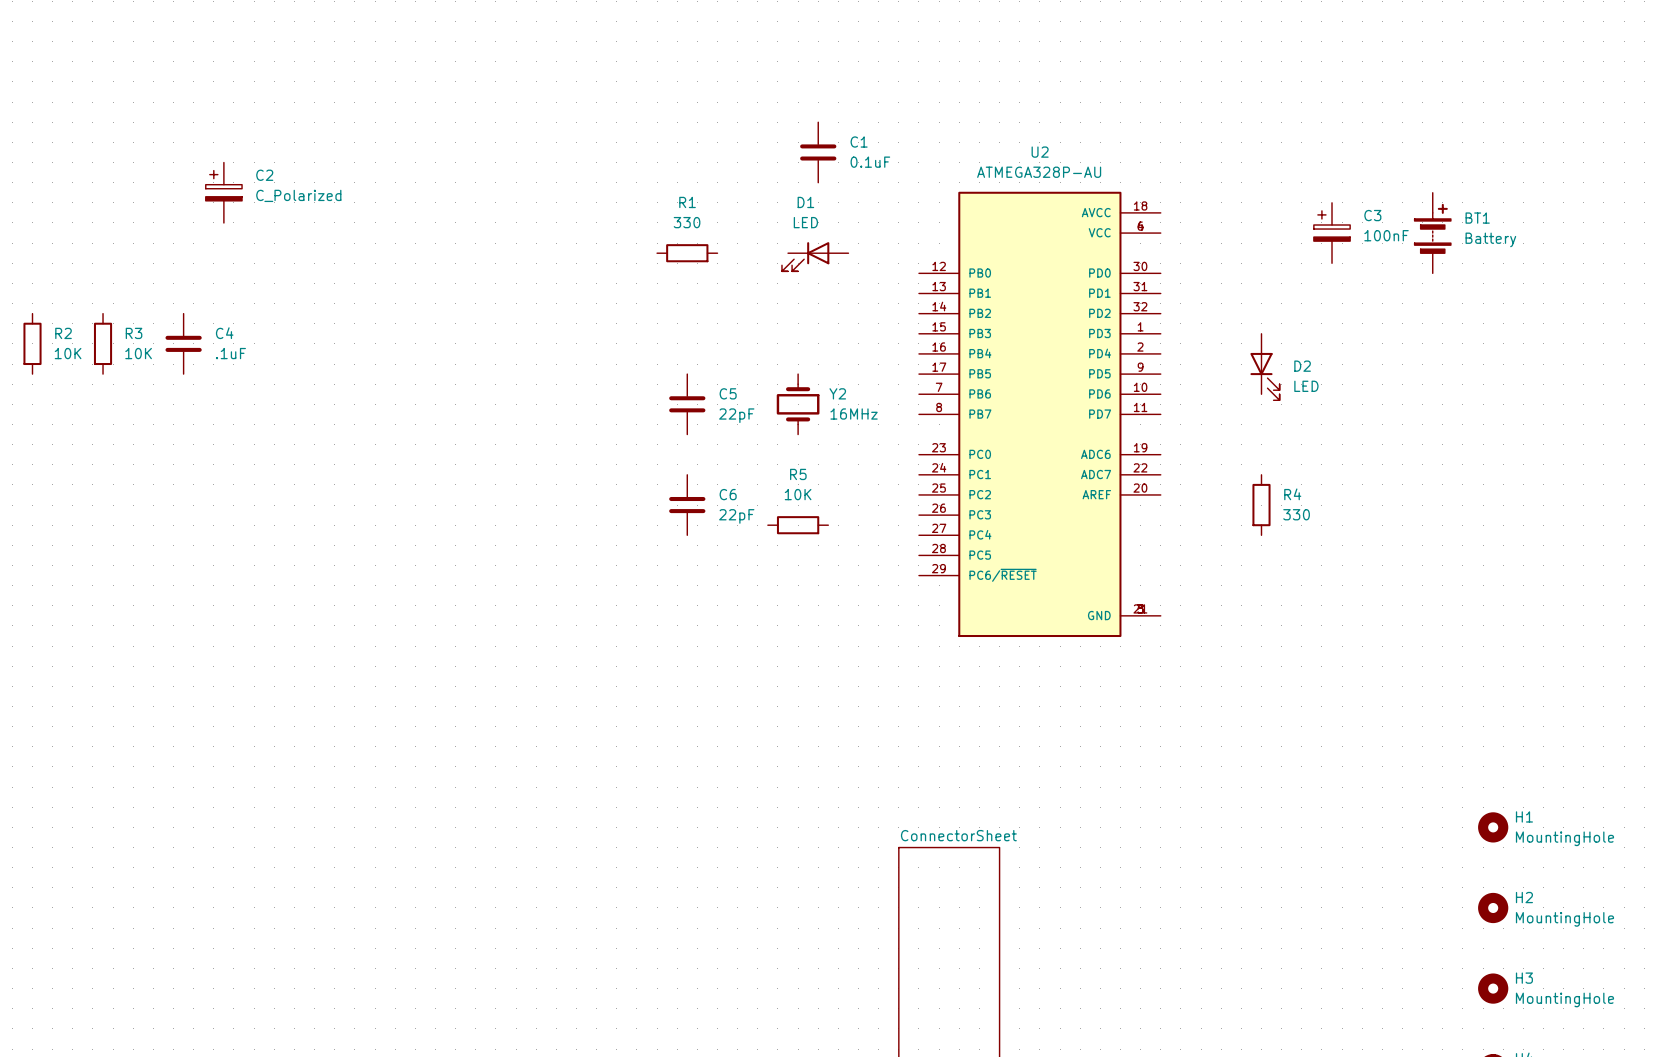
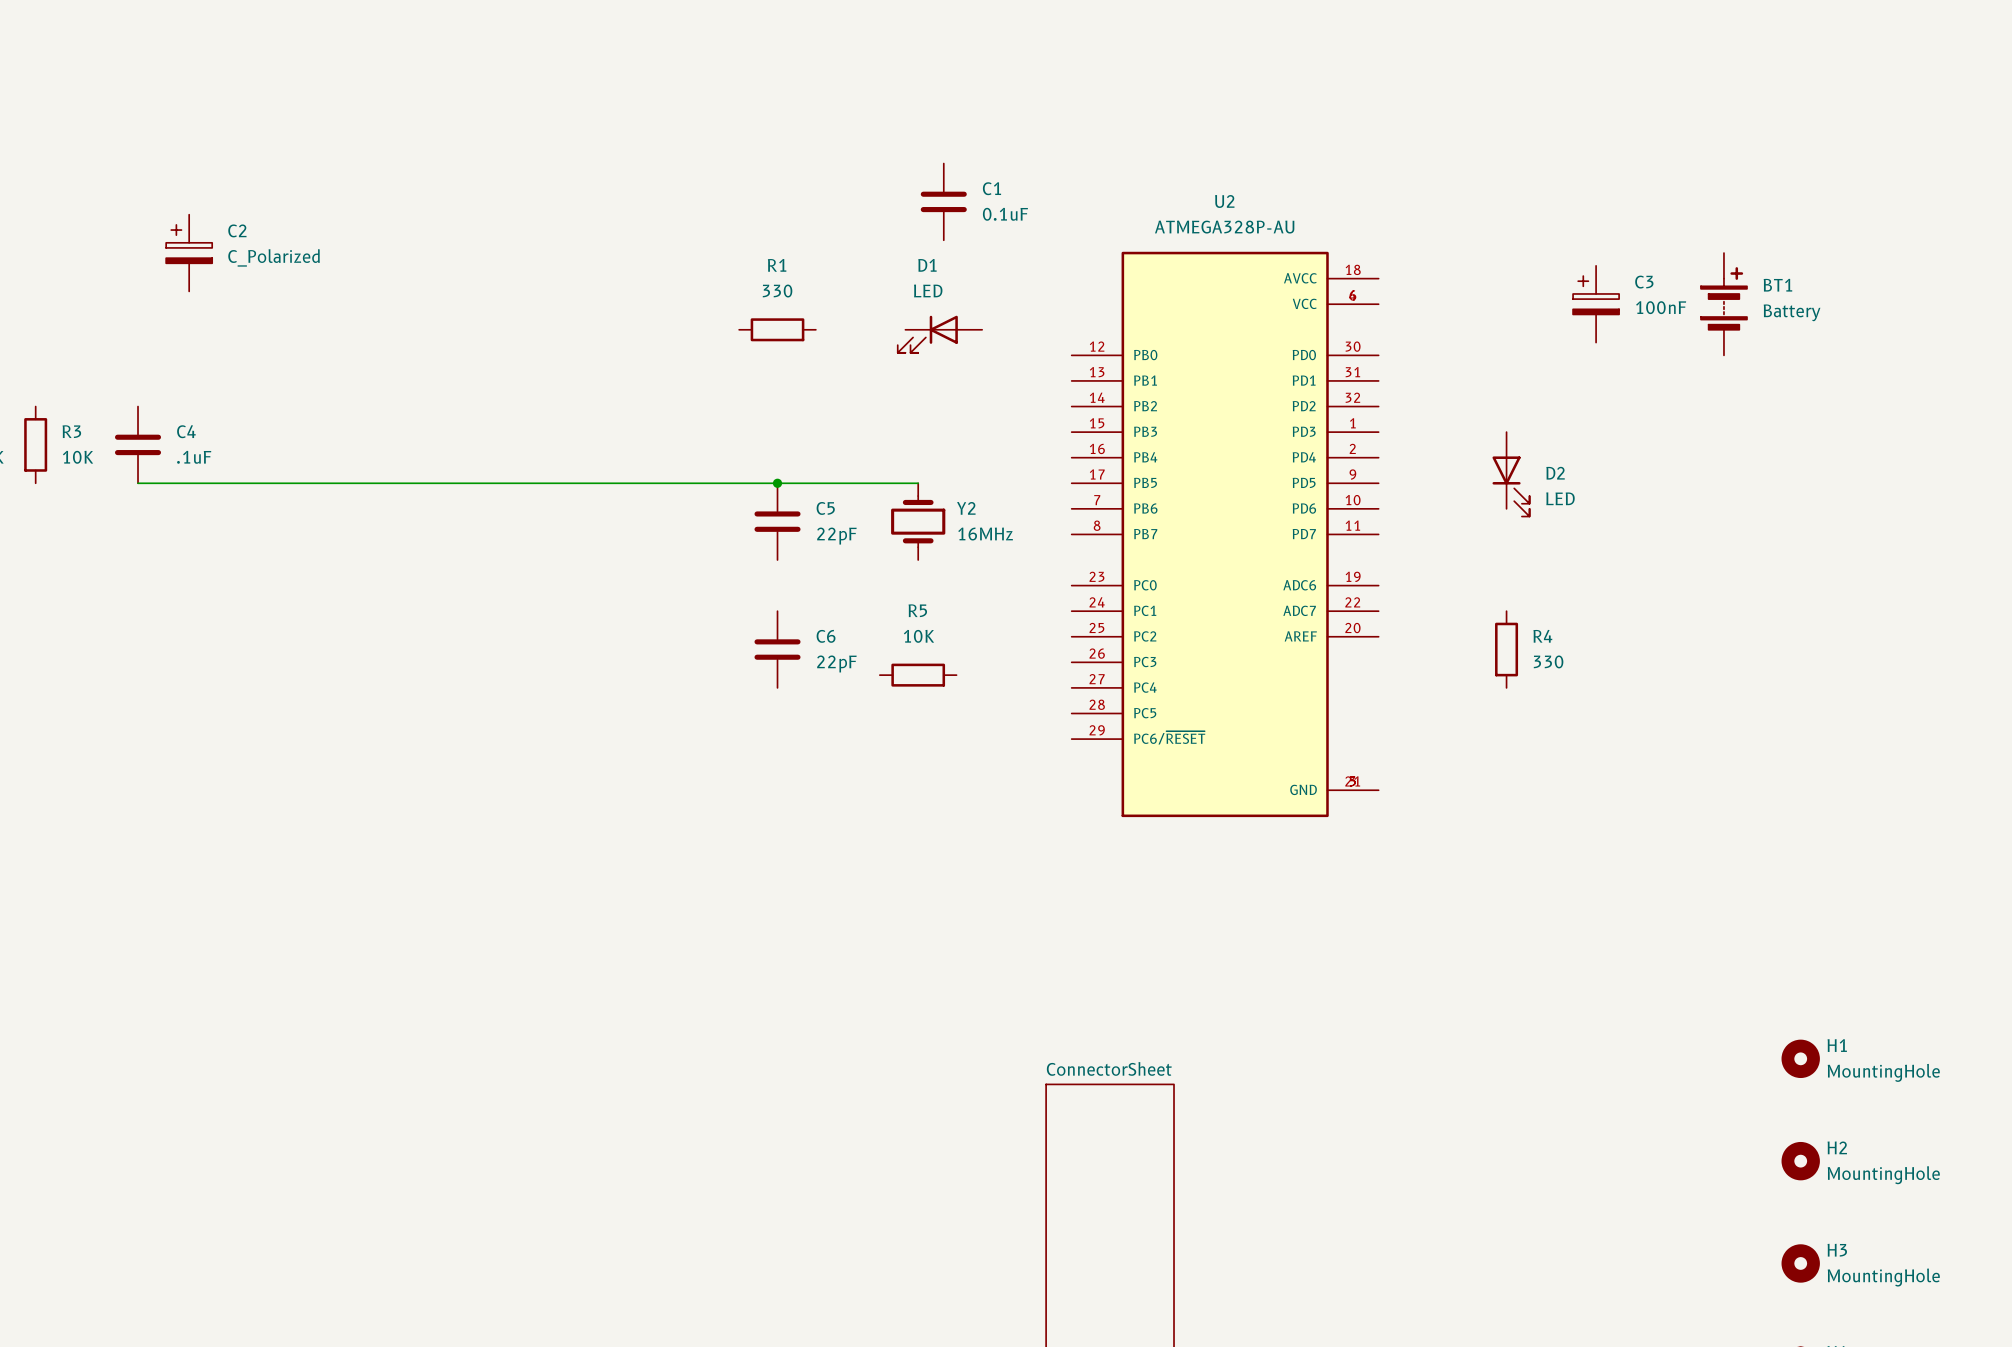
wire: none -> (138, 483) (918, 483)
junction: none -> (777, 483)

